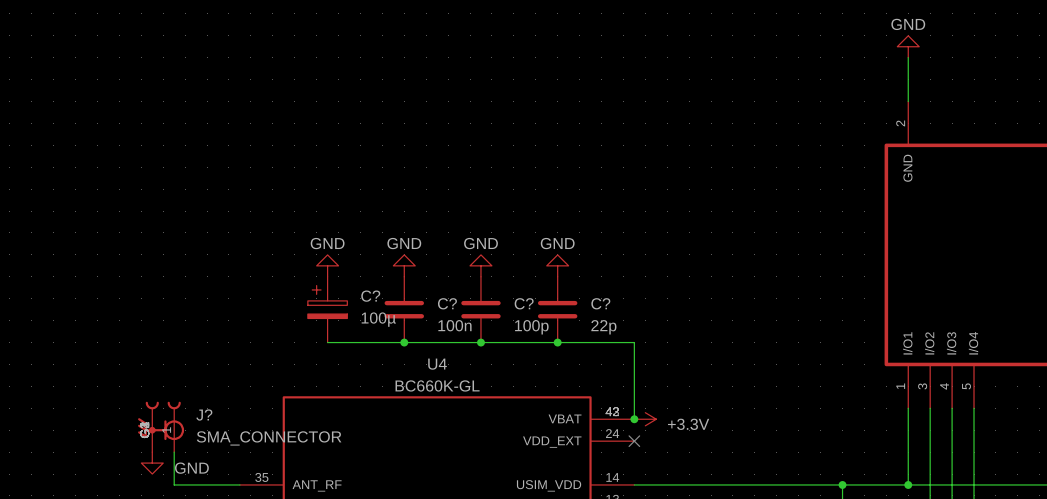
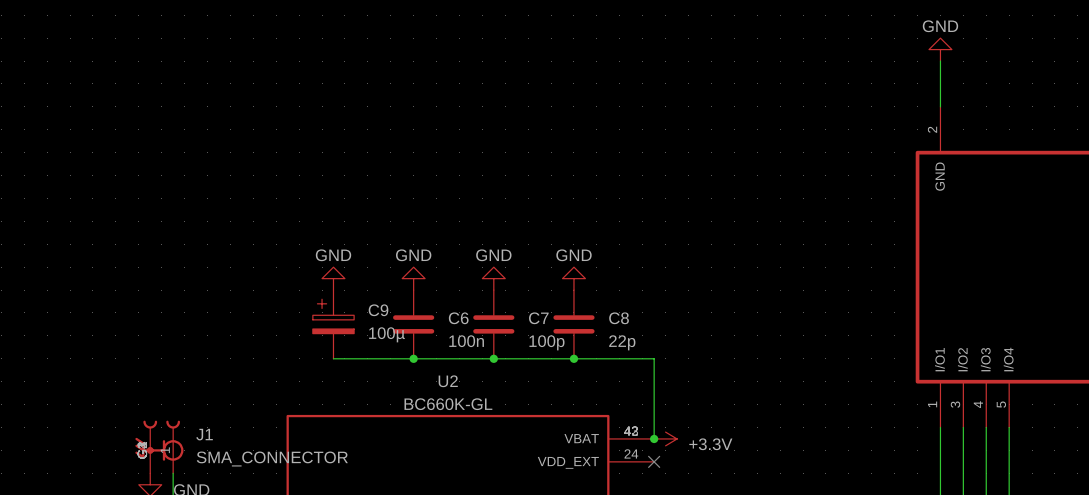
C? name: C? (370, 296) -> C9 (378, 310)
C? name: C? (447, 303) -> C6 (458, 318)
C? name: C? (524, 303) -> C7 (538, 318)
C? name: C? (600, 303) -> C8 (619, 318)
U4 name: U4 (437, 364) -> U2 (448, 381)
J? name: J? (204, 415) -> J1 (204, 434)

